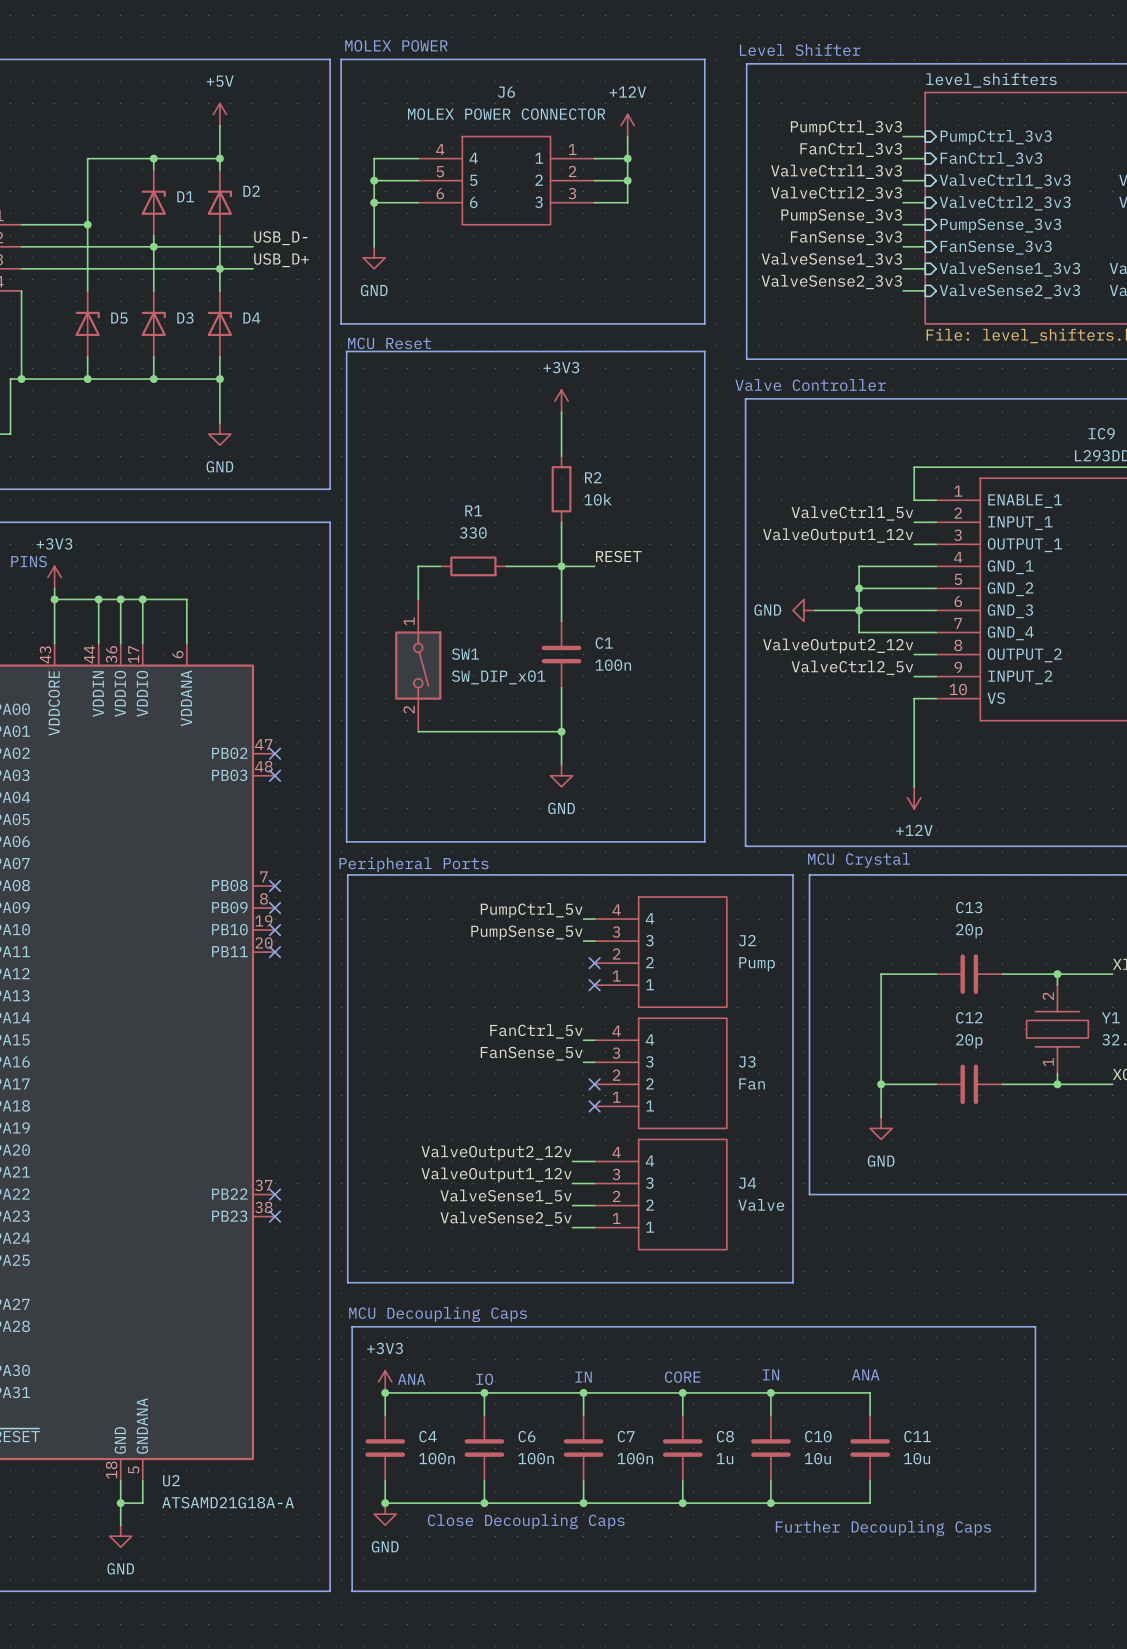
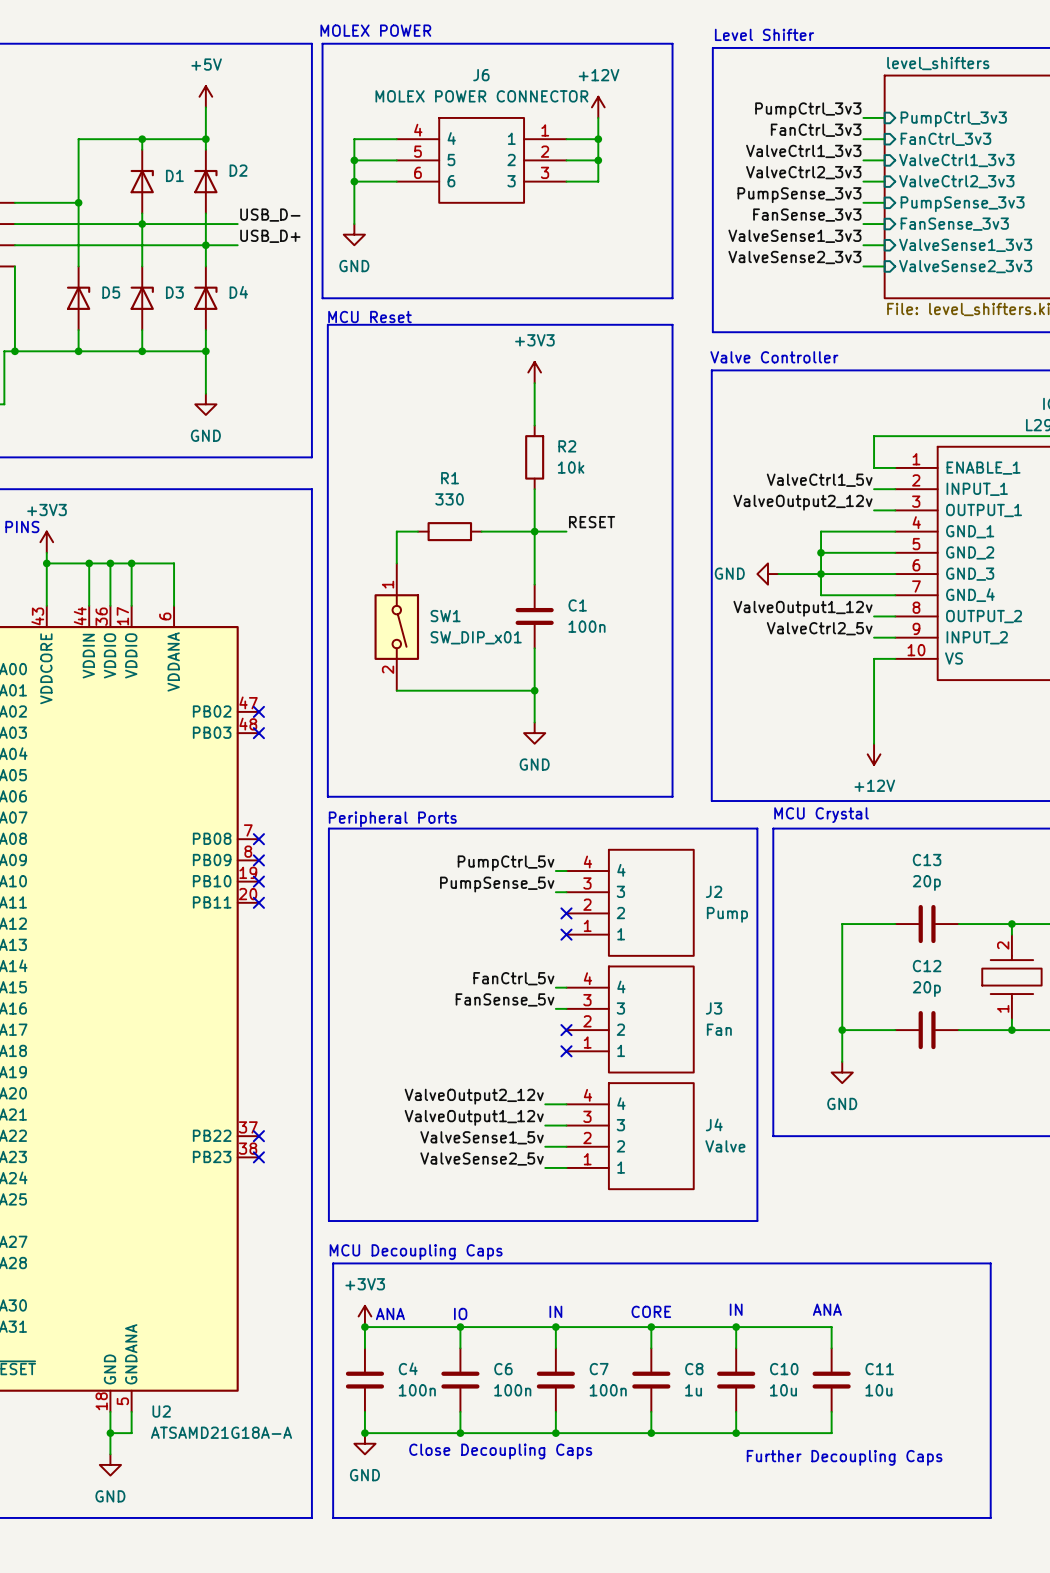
label: ValveOutput1_12v (838, 535) -> ValveOutput2_12v (803, 502)
label: ValveOutput2_12v (838, 645) -> ValveOutput1_12v (803, 608)

